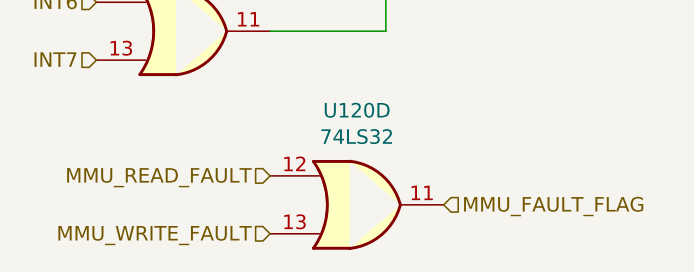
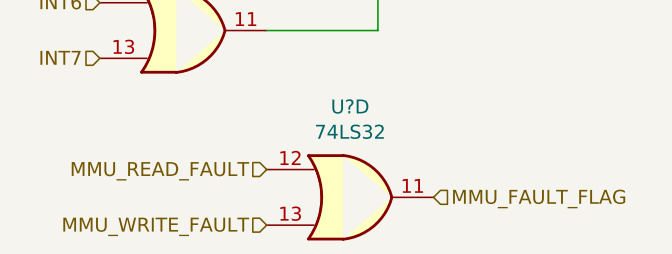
U120D name: U120D (357, 110) -> U?D (350, 106)

